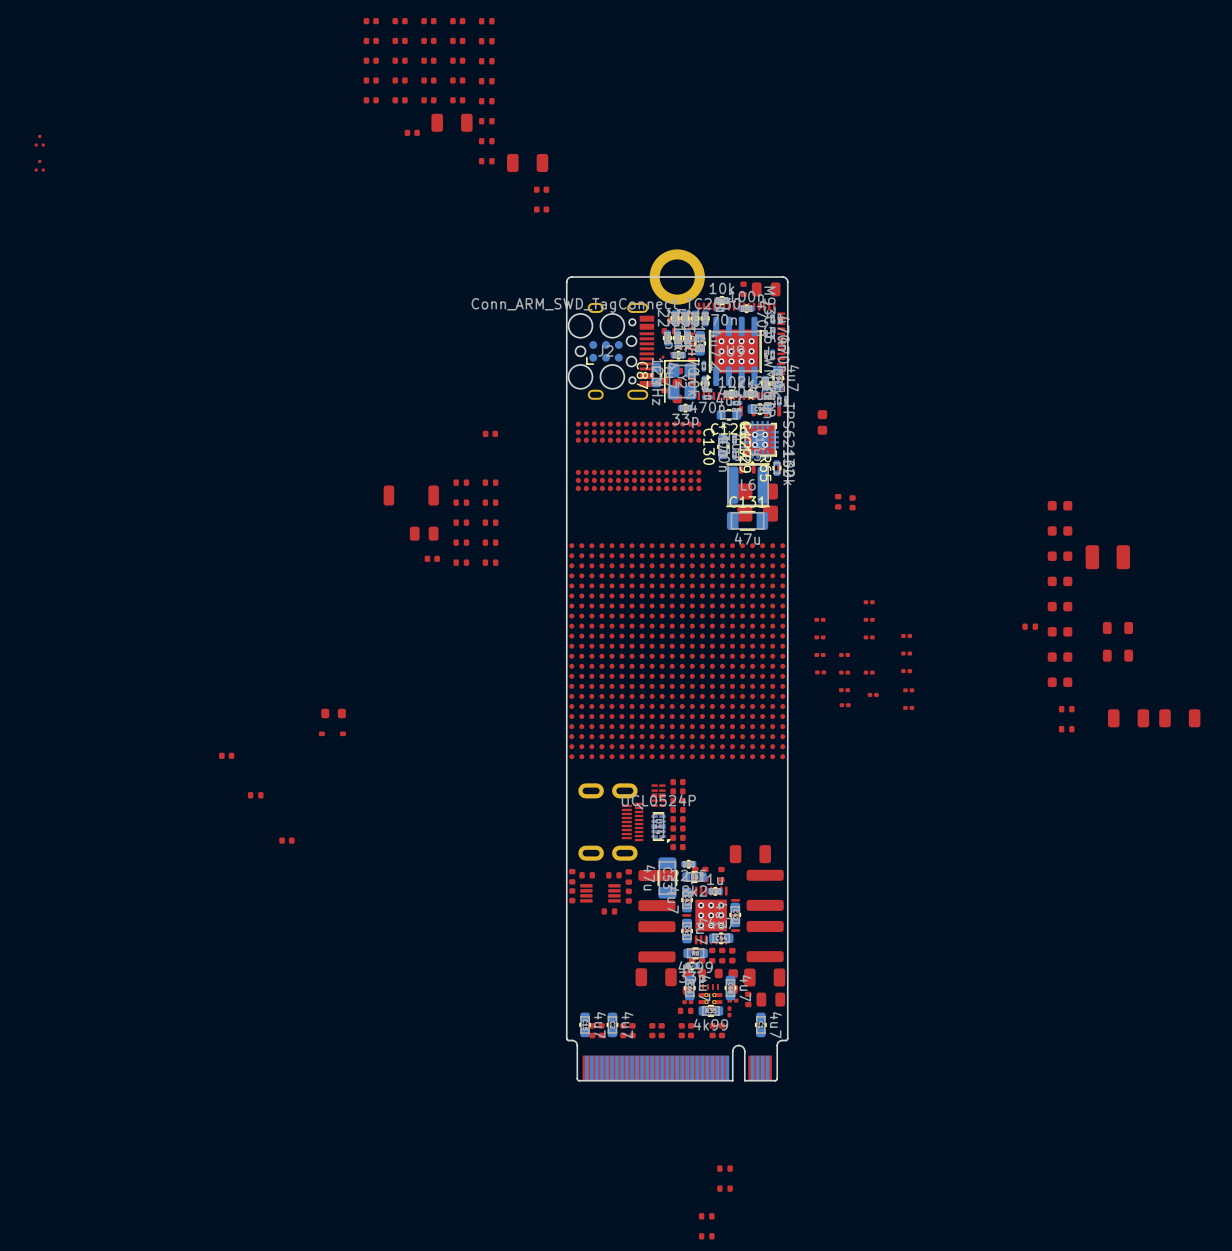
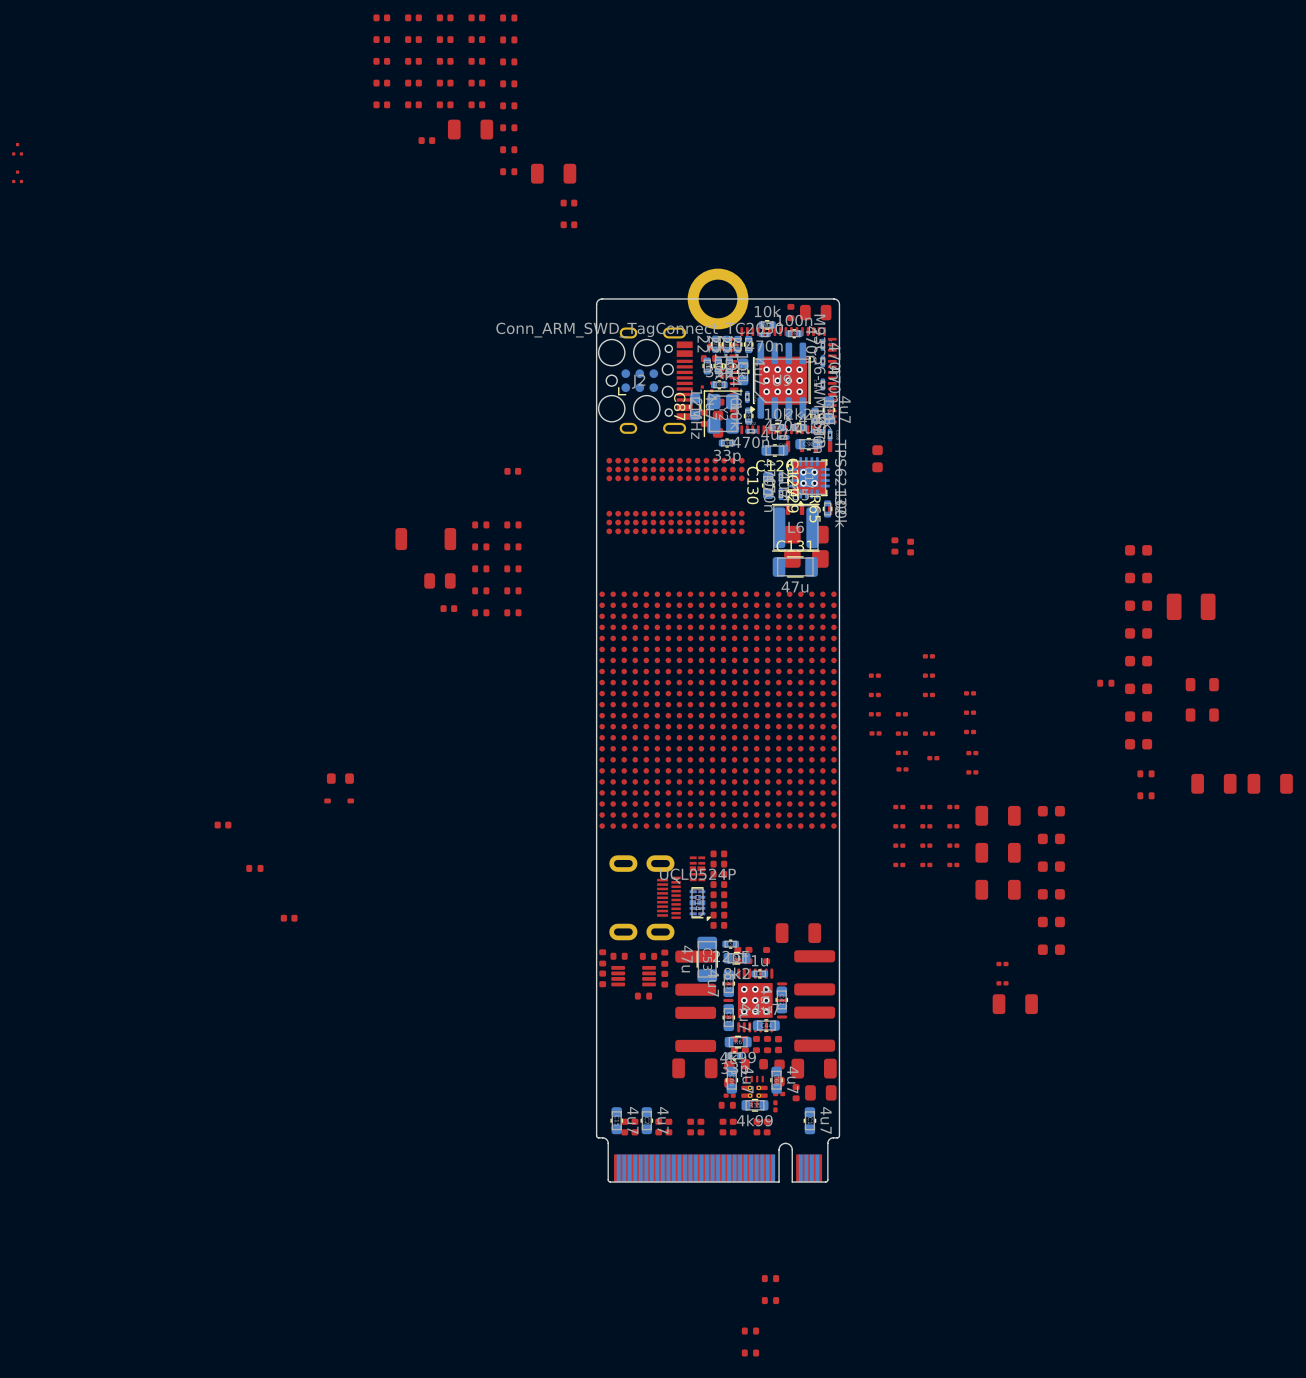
part: none -> (899, 807)
part: none -> (926, 807)
part: none -> (953, 807)
part: none -> (1051, 811)
part: none -> (998, 815)
part: none -> (899, 826)
part: none -> (926, 826)
part: none -> (953, 826)
part: none -> (1051, 838)
part: none -> (899, 845)
part: none -> (926, 845)
part: none -> (953, 845)
part: none -> (998, 852)
part: none -> (899, 864)
part: none -> (926, 864)
part: none -> (953, 864)
part: none -> (1051, 866)
part: none -> (998, 889)
part: none -> (1051, 894)
part: none -> (1051, 922)
part: none -> (1051, 949)
part: none -> (1002, 964)
part: none -> (1002, 983)
part: none -> (1015, 1004)

